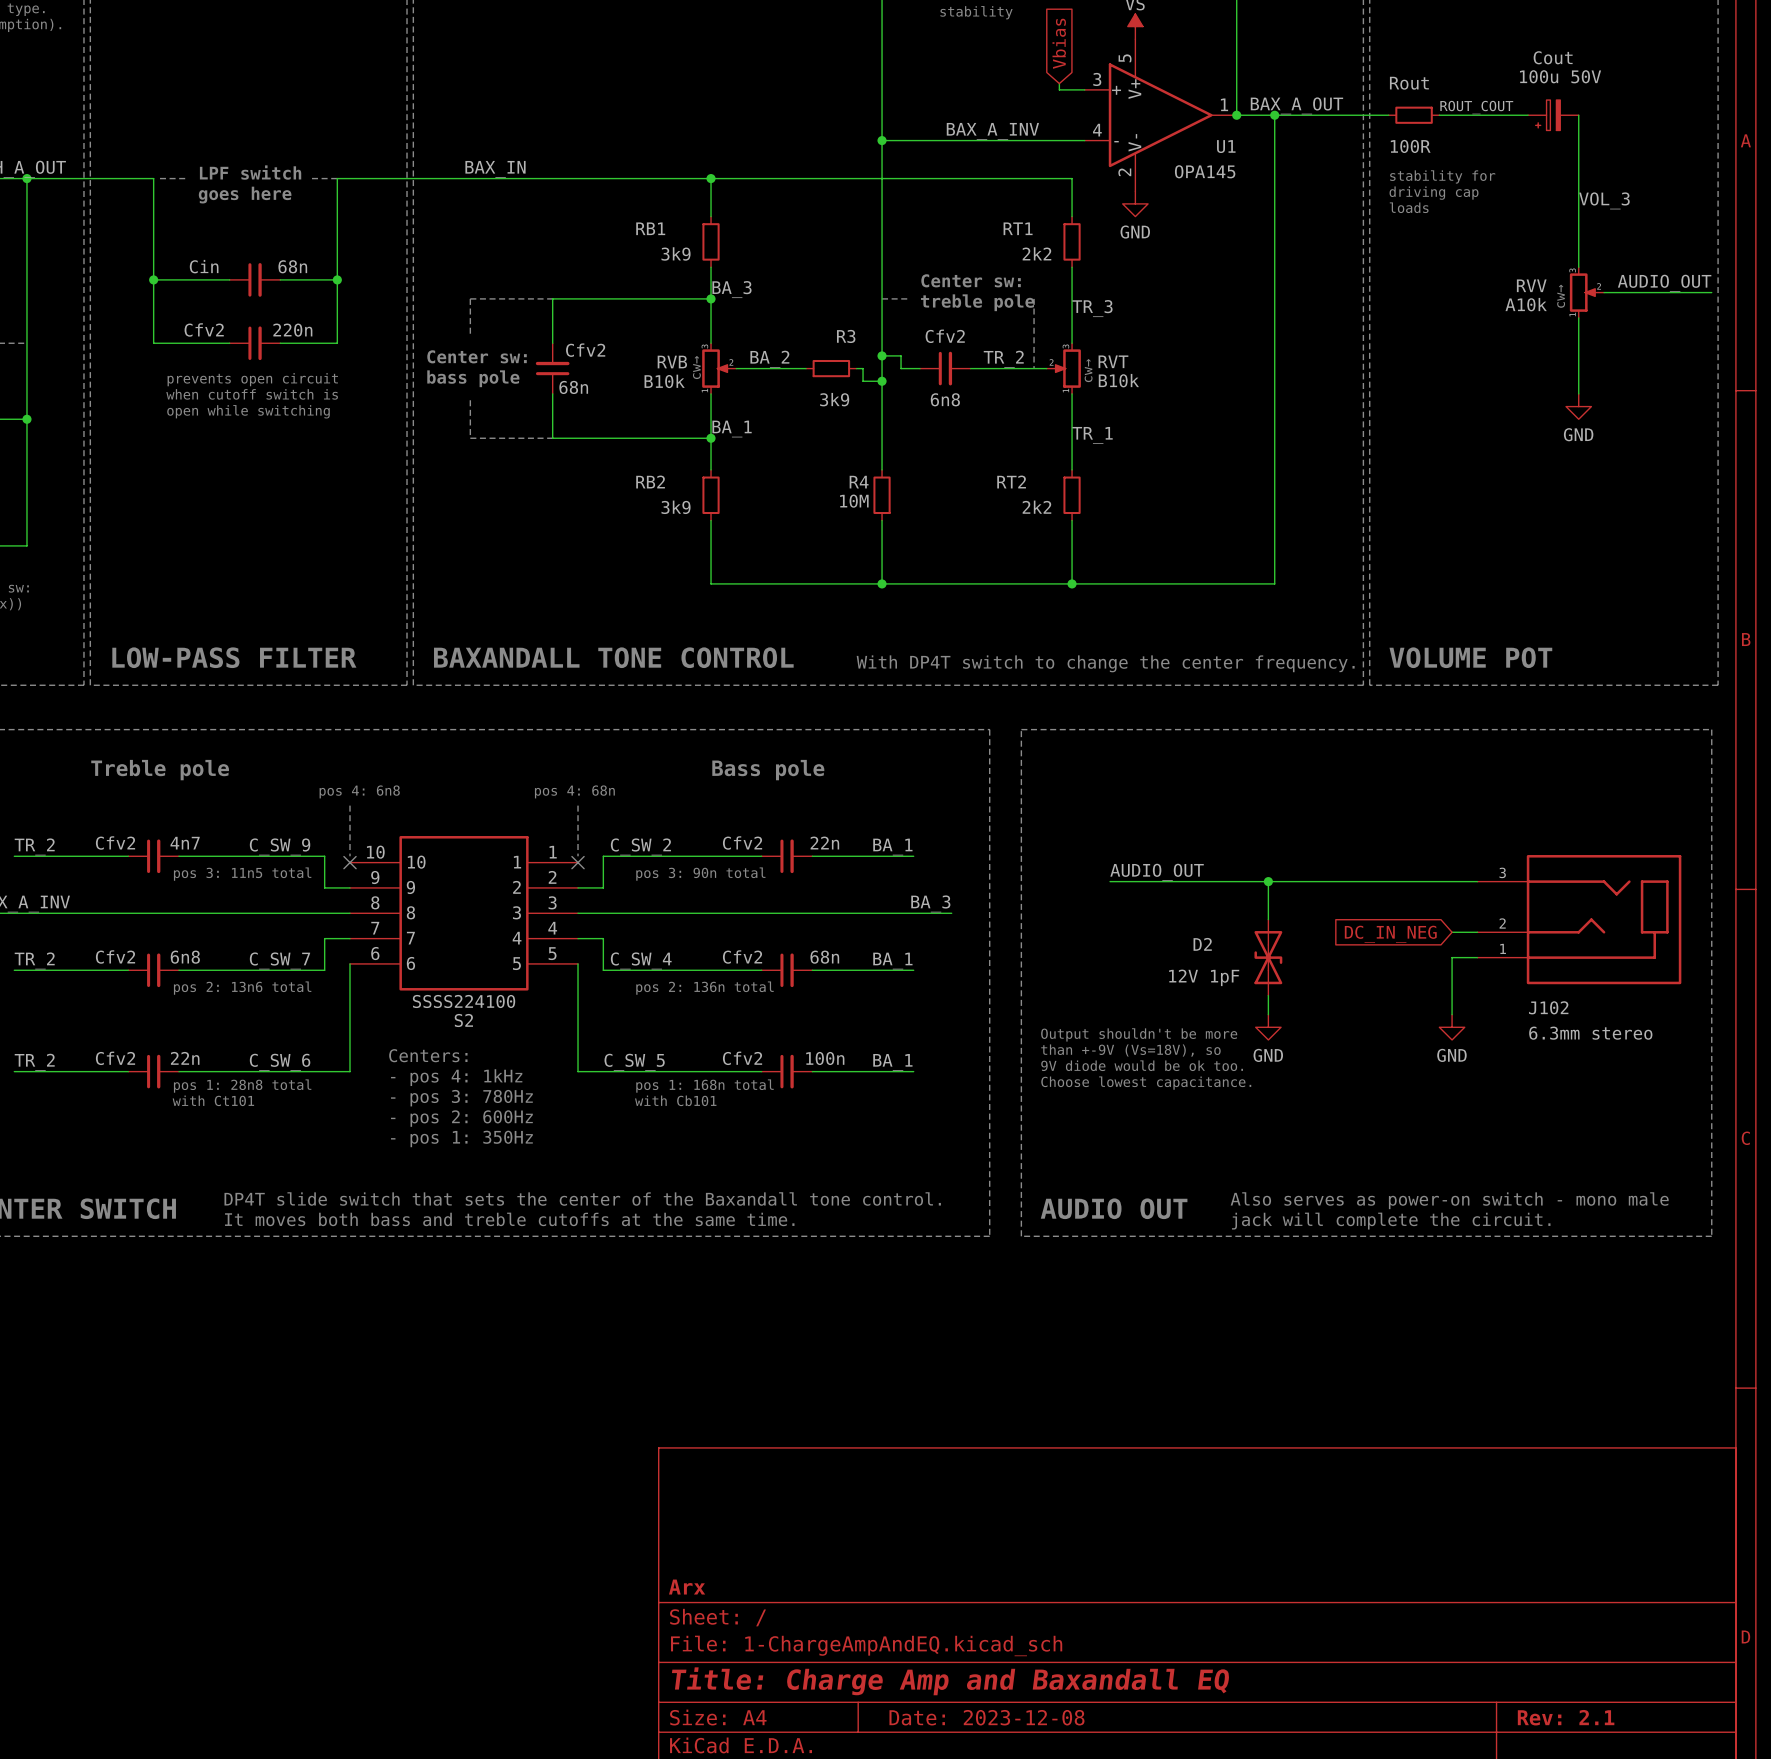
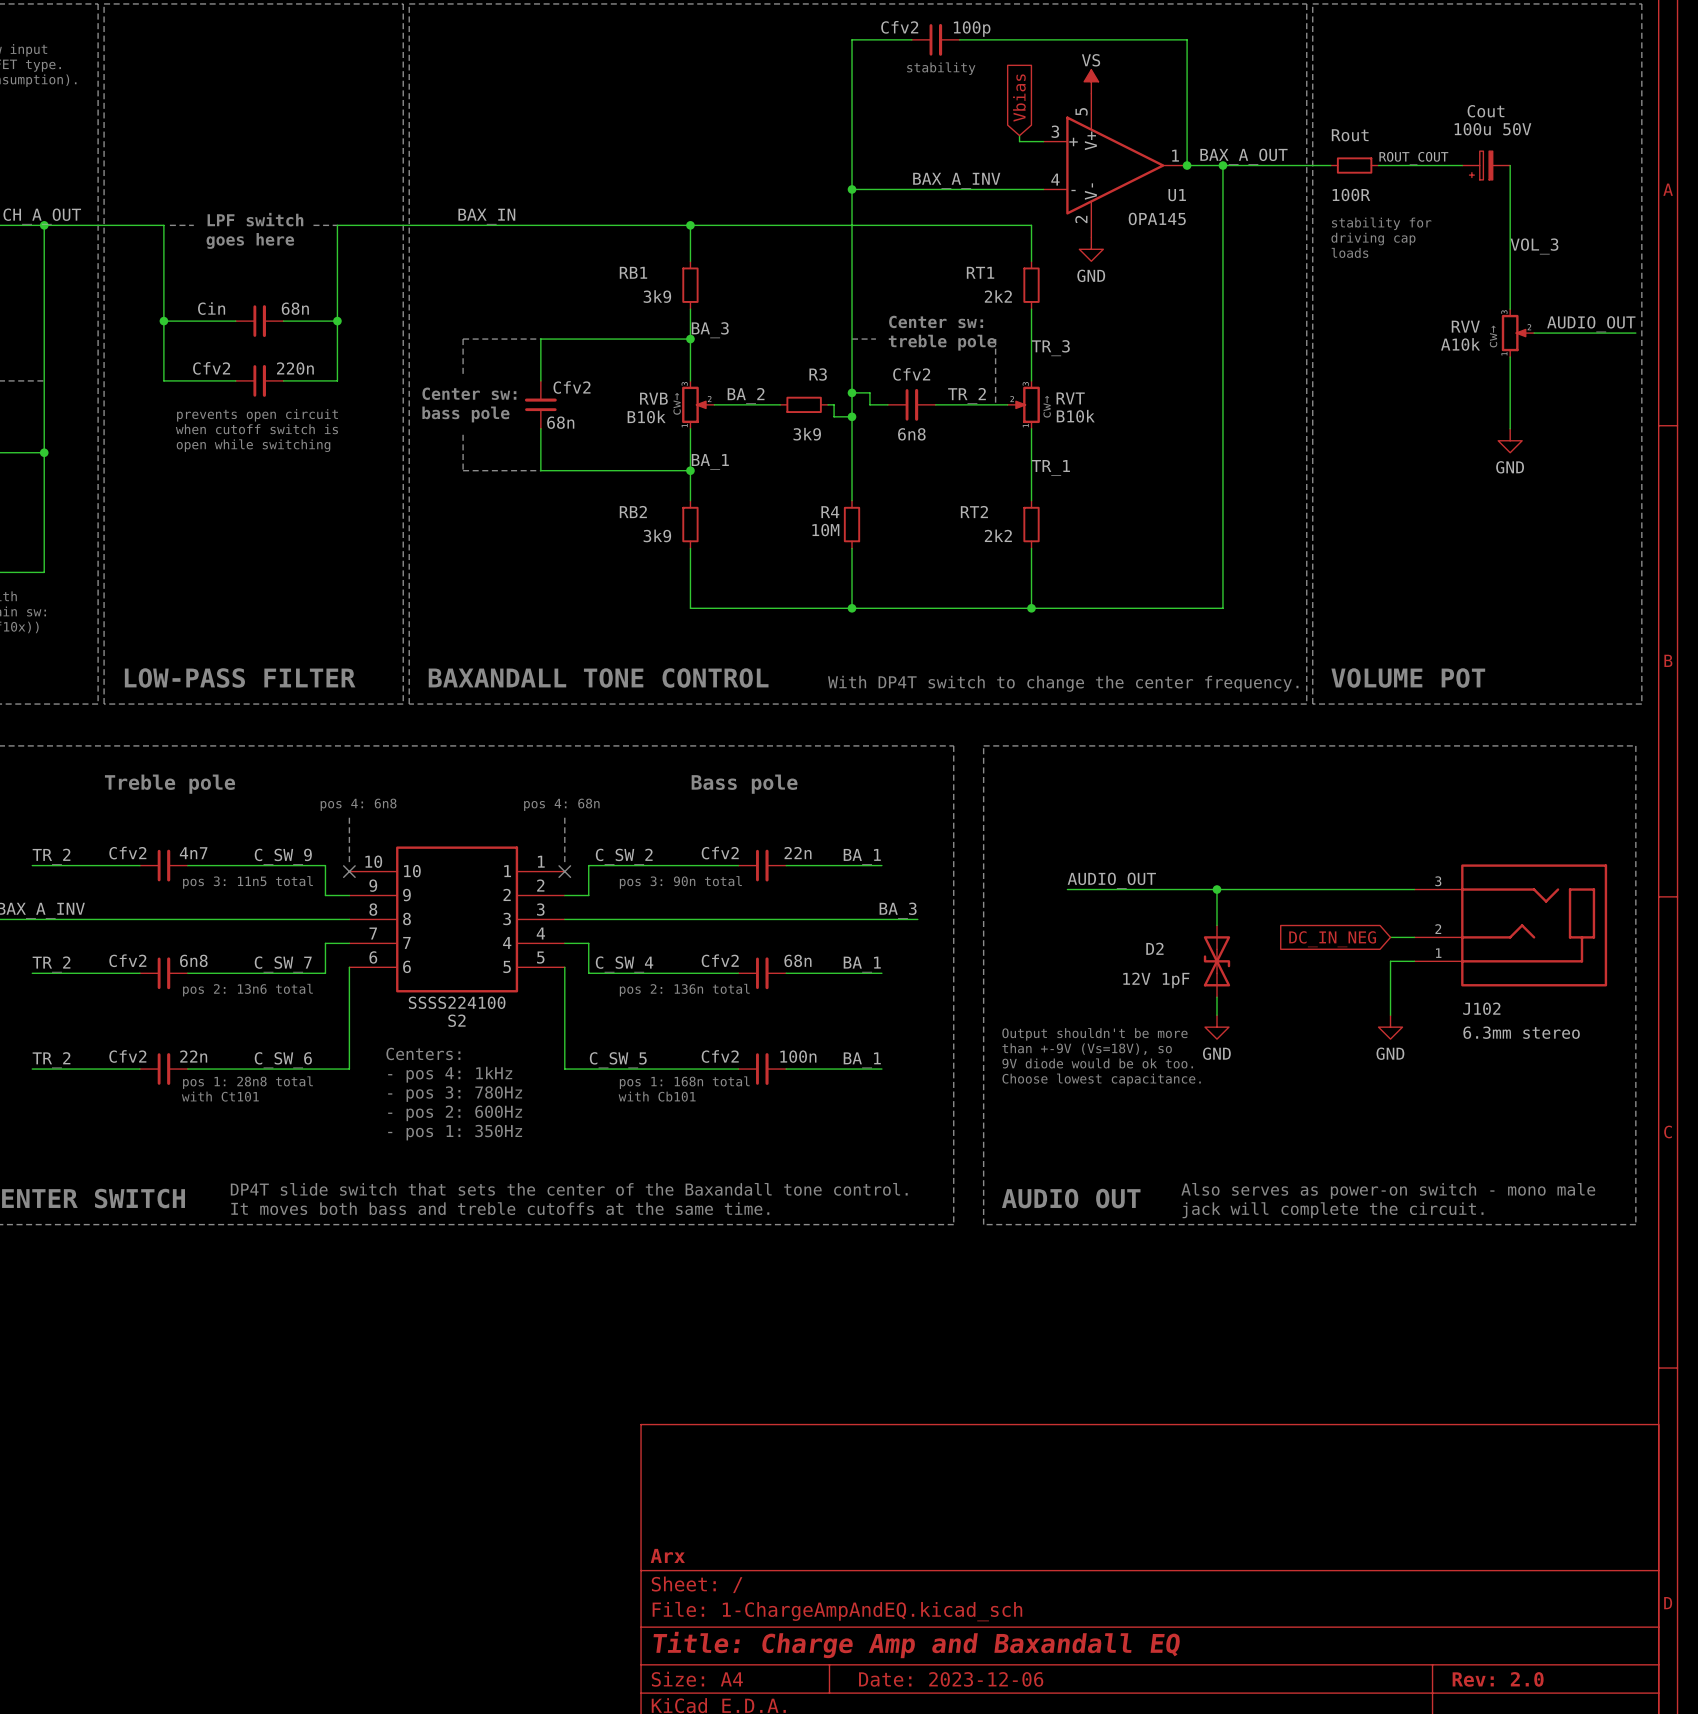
title block: Date: 2023-12-08 (986, 1717) -> Date: 2023-12-06 (951, 1679)
title block: Rev: 2.1 (1566, 1717) -> Rev: 2.0 (1498, 1679)

